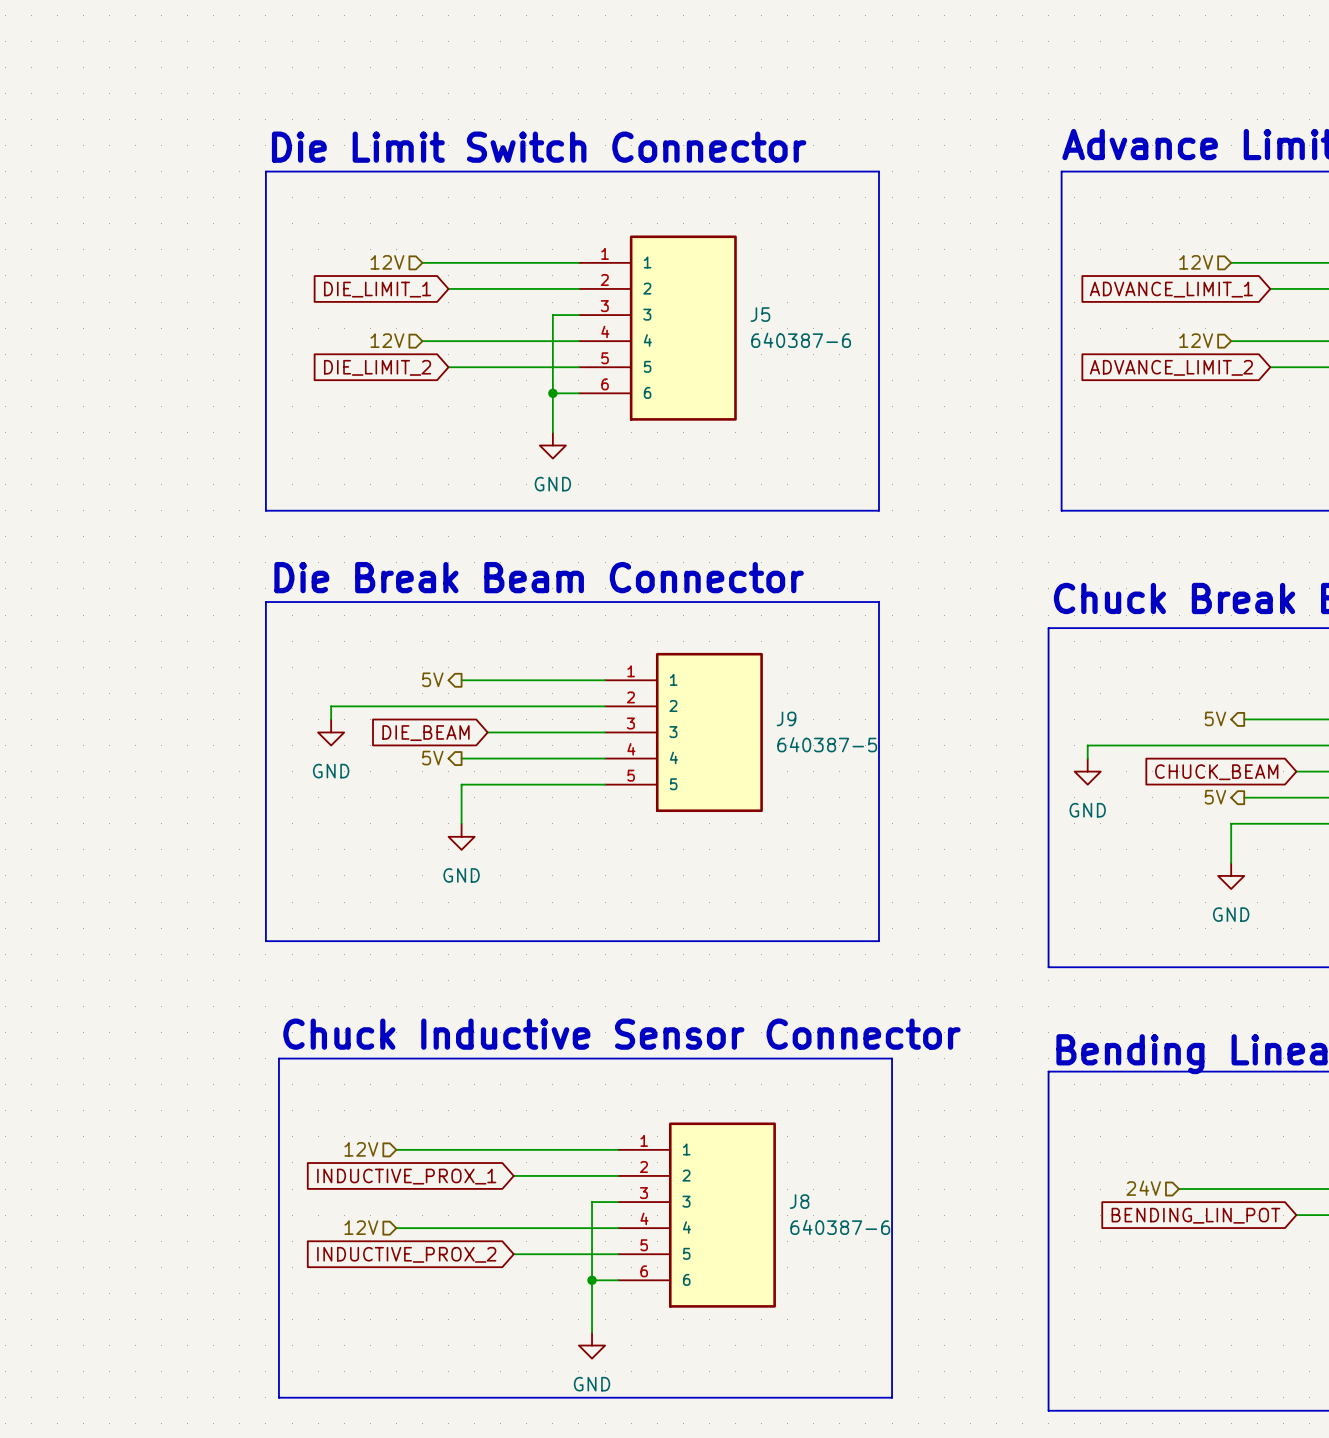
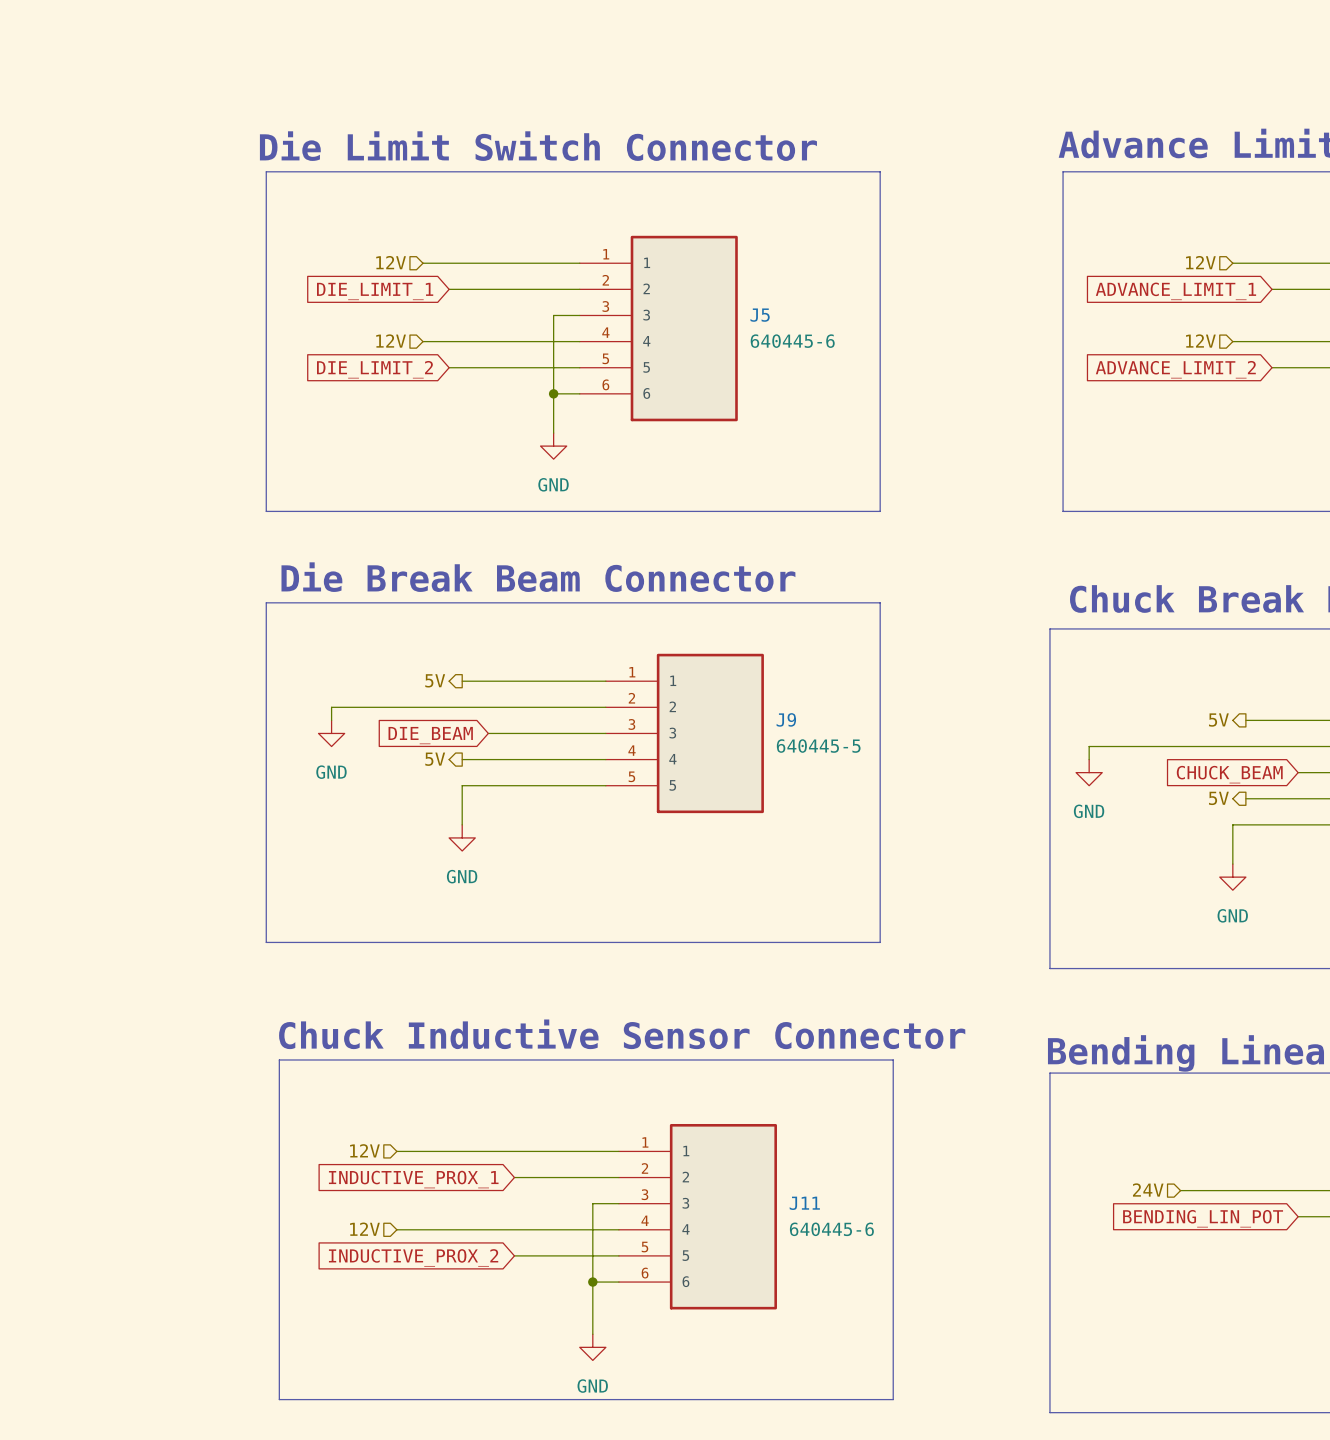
J5 value: 640387-6 (801, 340) -> 640445-6 (792, 341)
J9 value: 640387-5 (827, 744) -> 640445-5 (818, 746)
J8 name: J8 (799, 1201) -> J11 (804, 1203)
J8 value: 640387-6 (840, 1227) -> 640445-6 (831, 1229)

